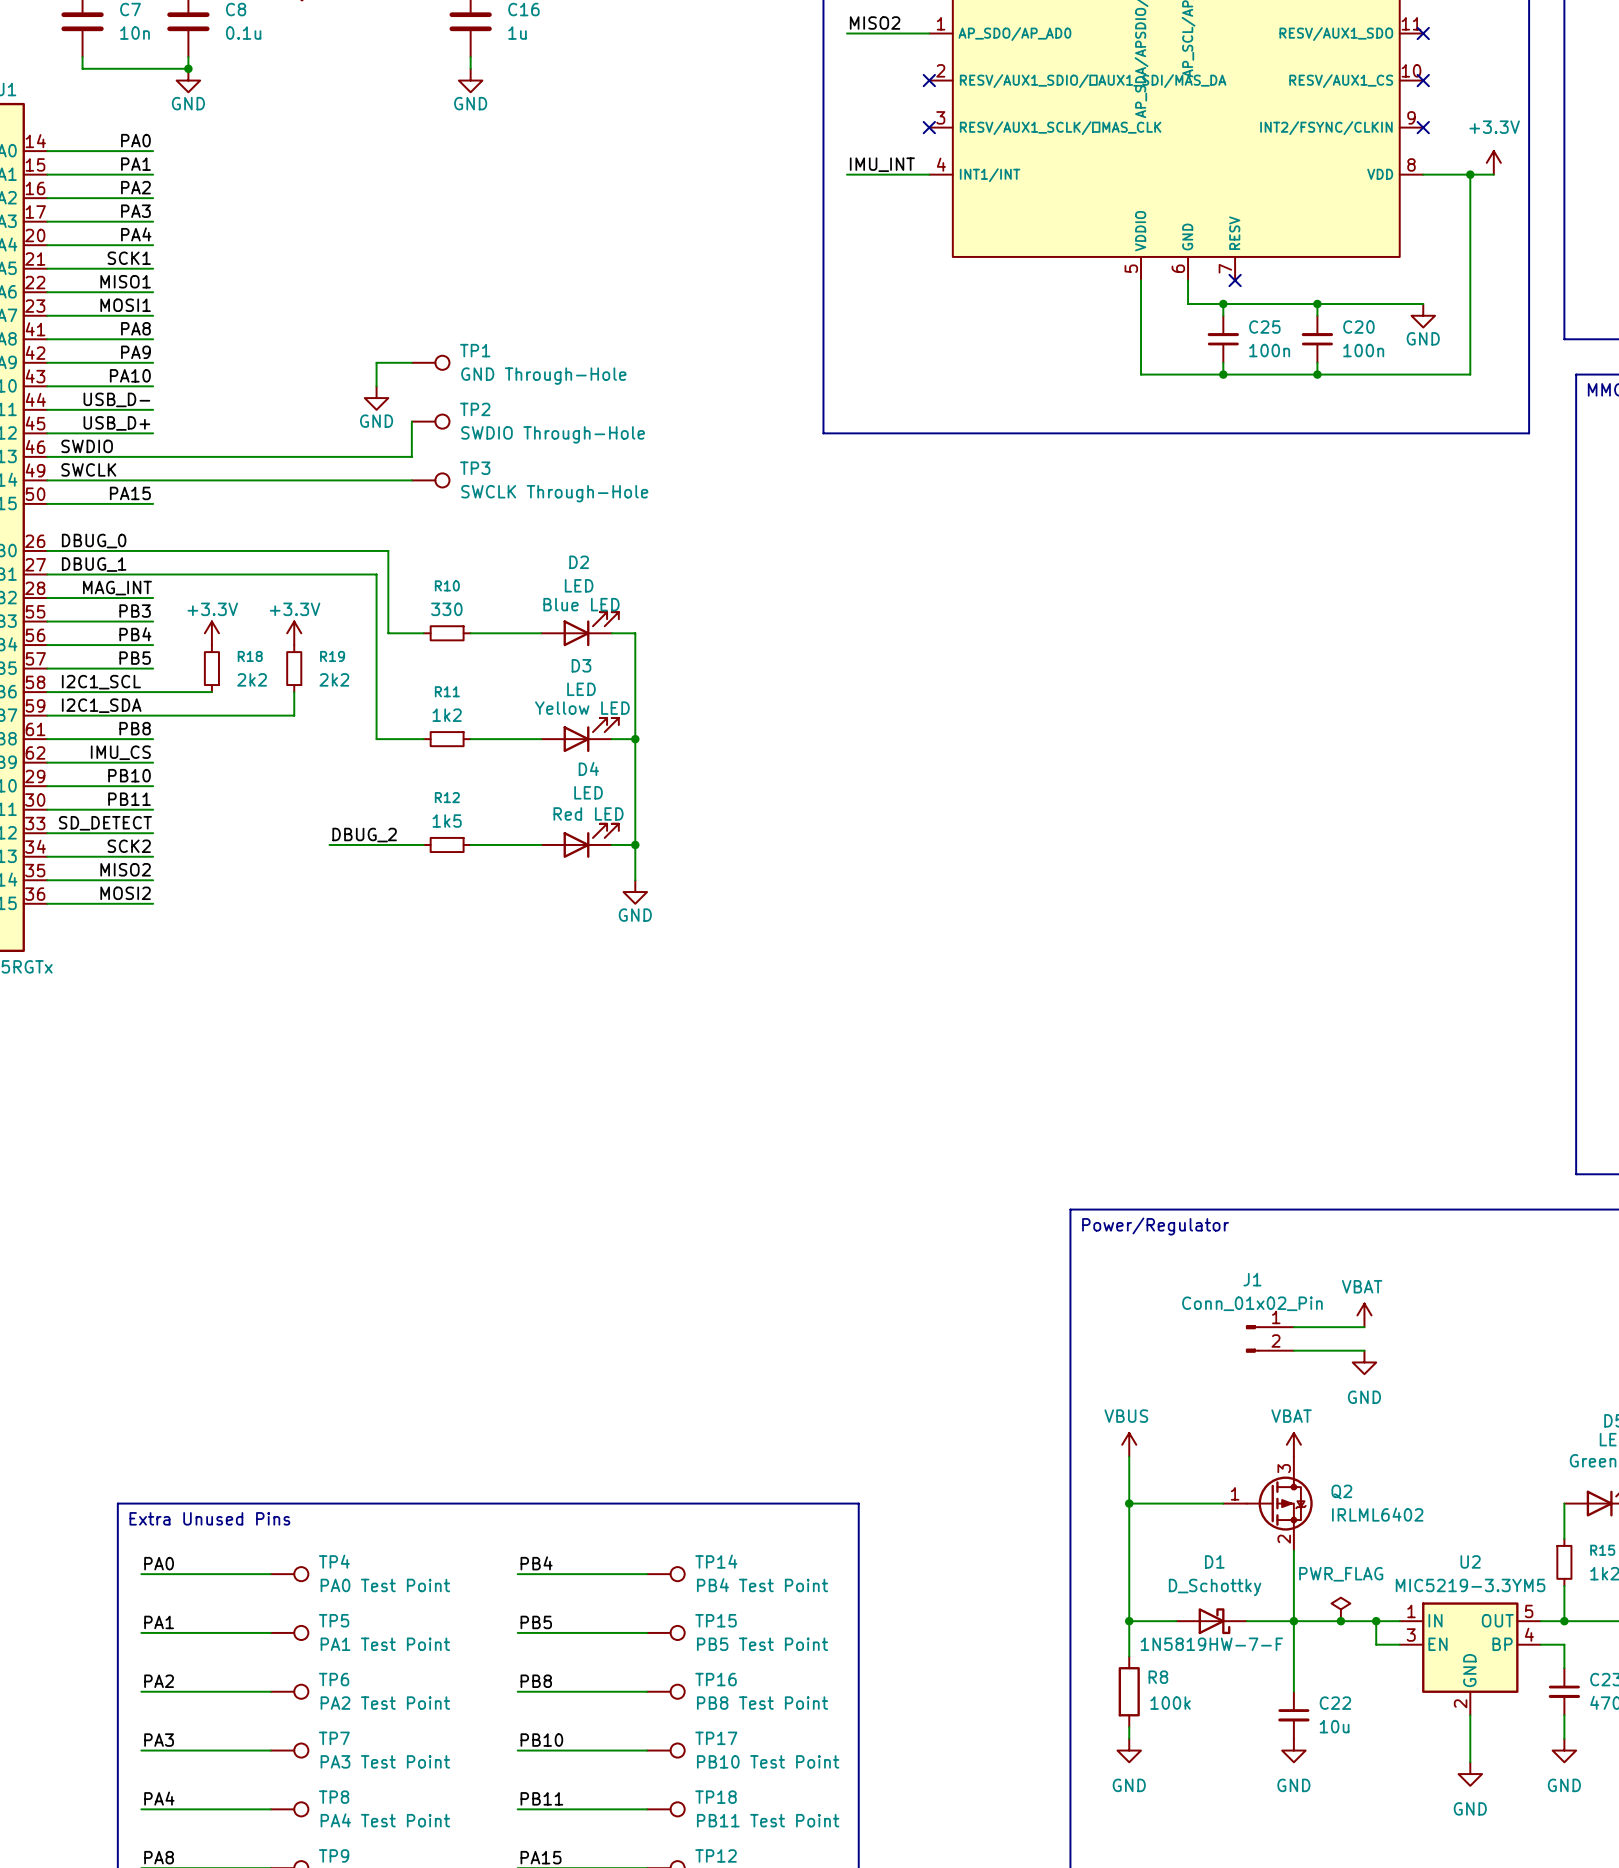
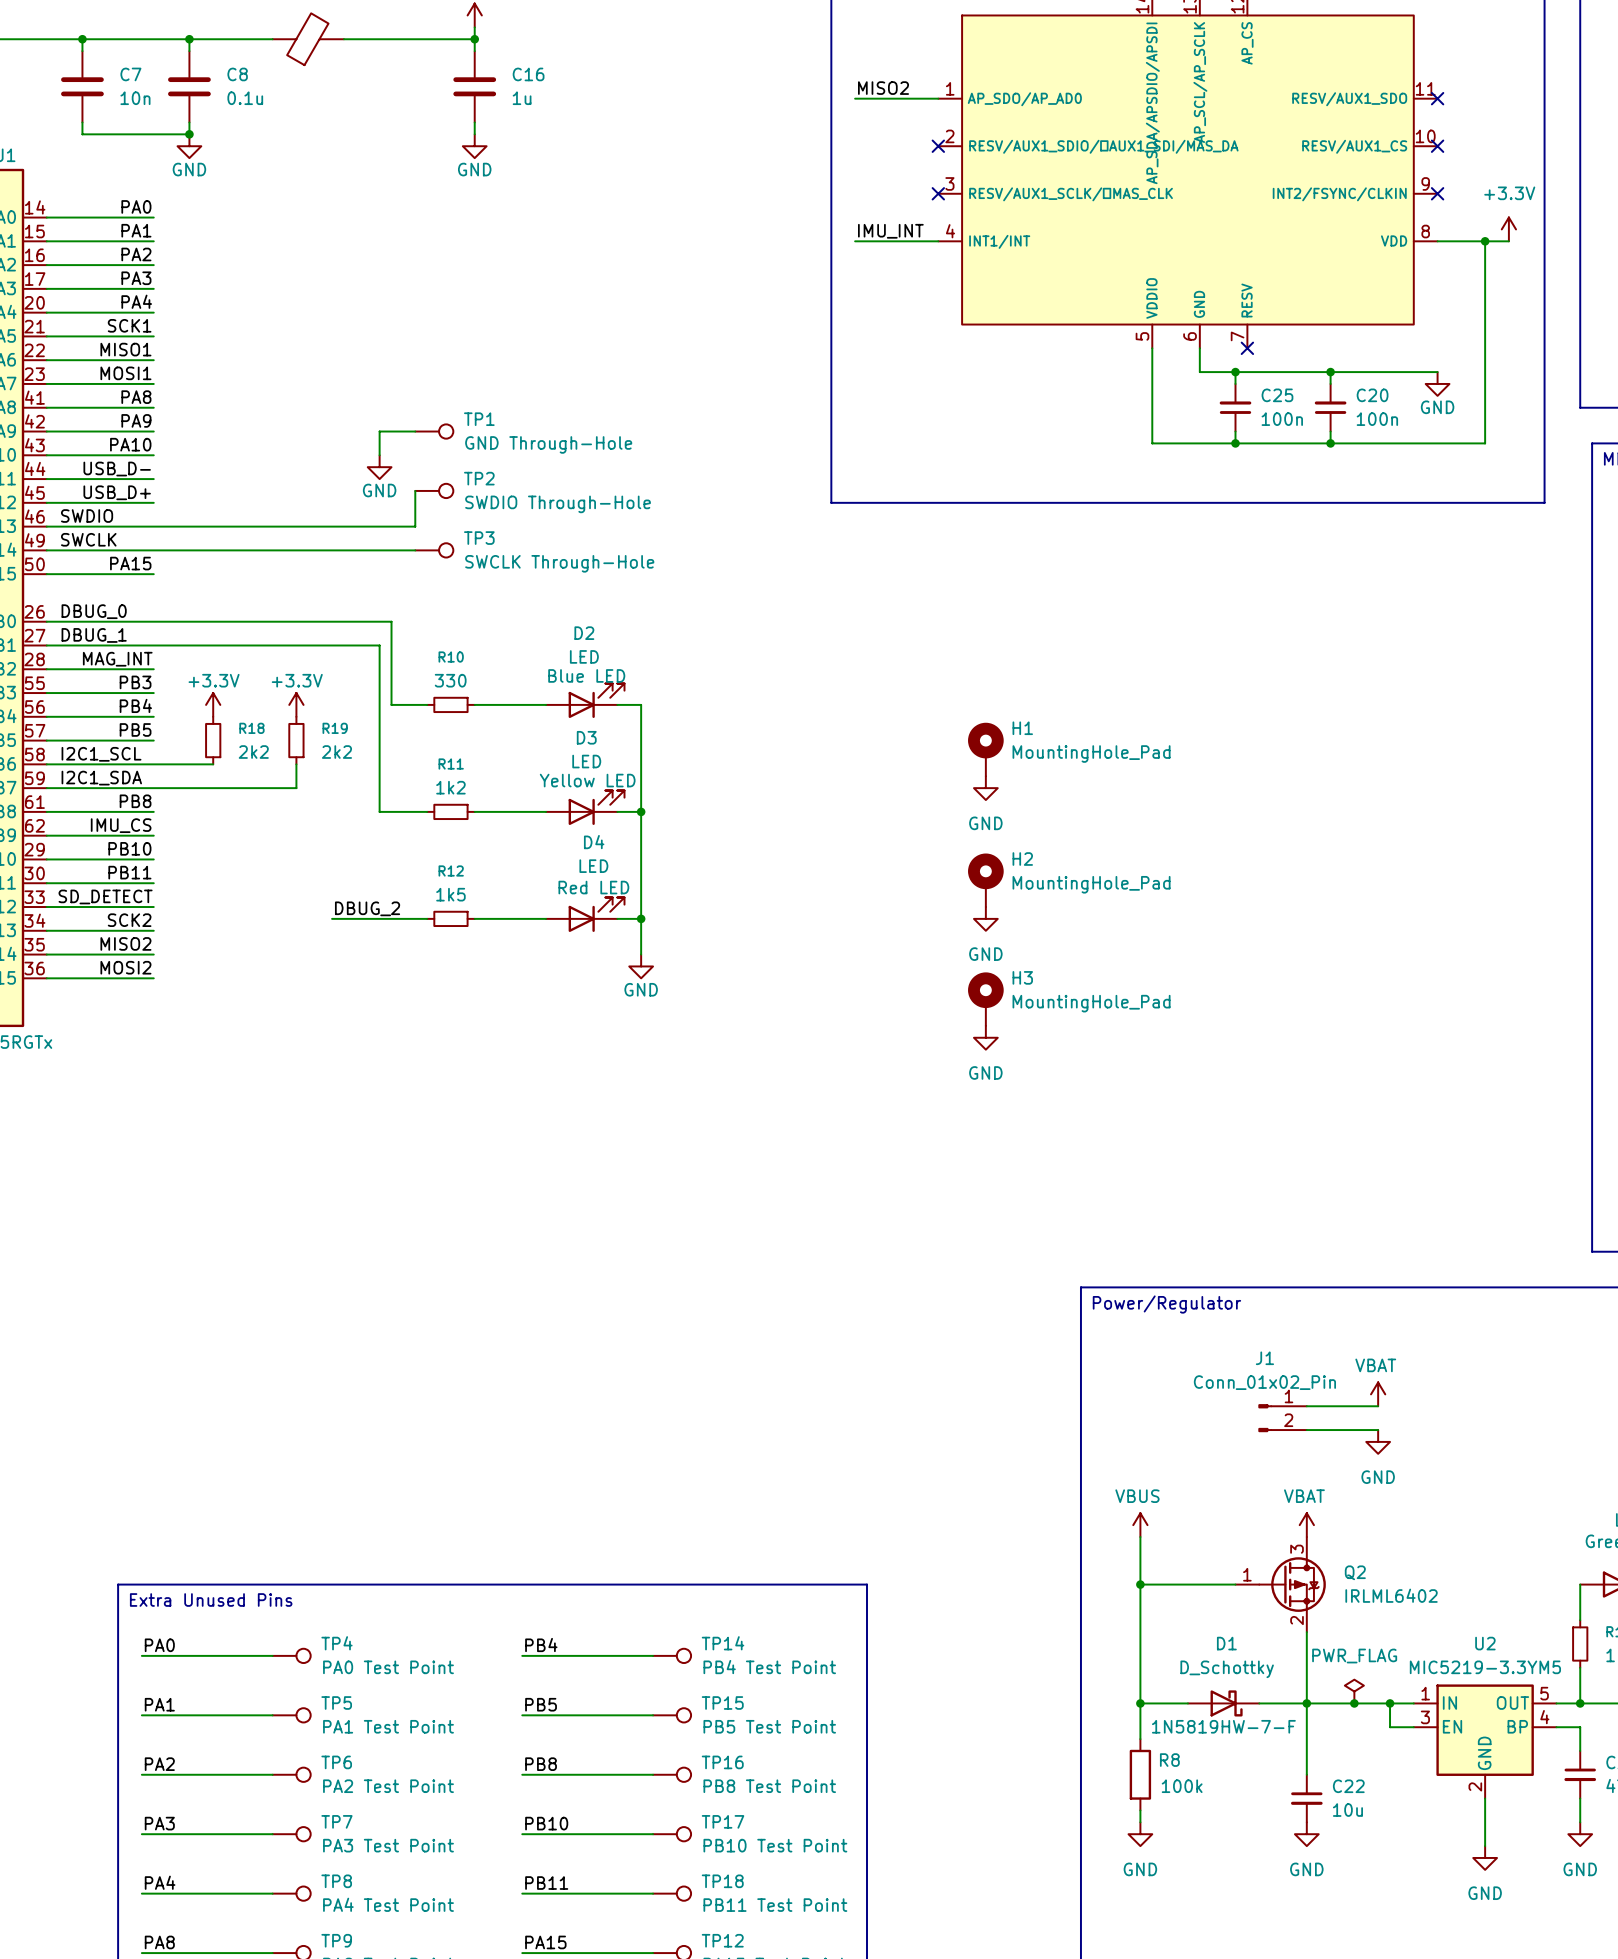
H1: none -> MountingHole_Pad (985, 749)
power symbol: none -> GND (985, 788)
H2: none -> MountingHole_Pad (985, 880)
power symbol: none -> GND (985, 918)
H3: none -> MountingHole_Pad (985, 999)
power symbol: none -> GND (985, 1037)

